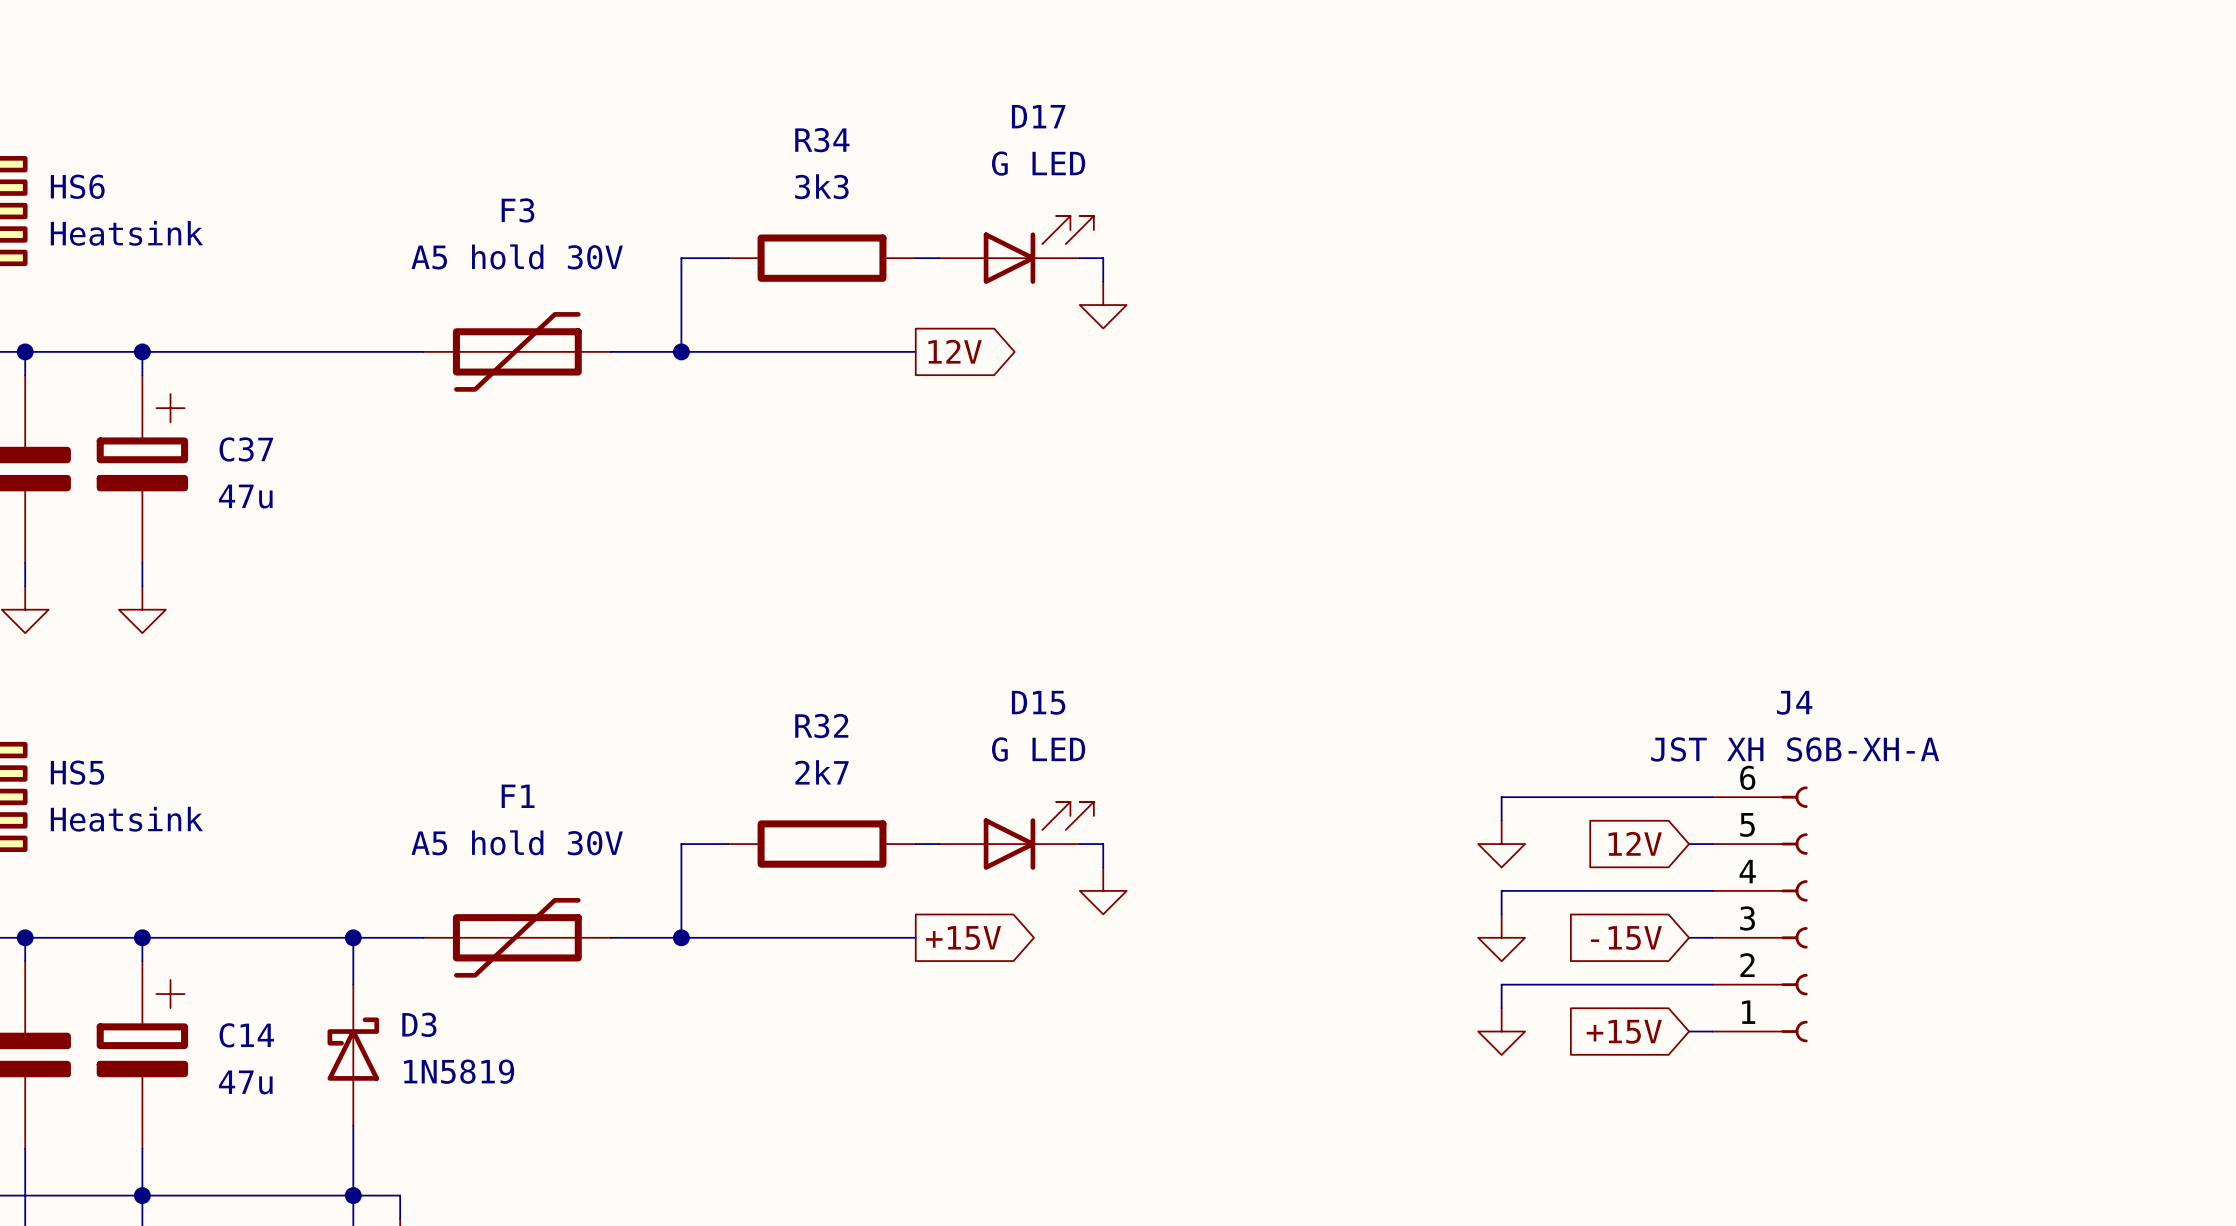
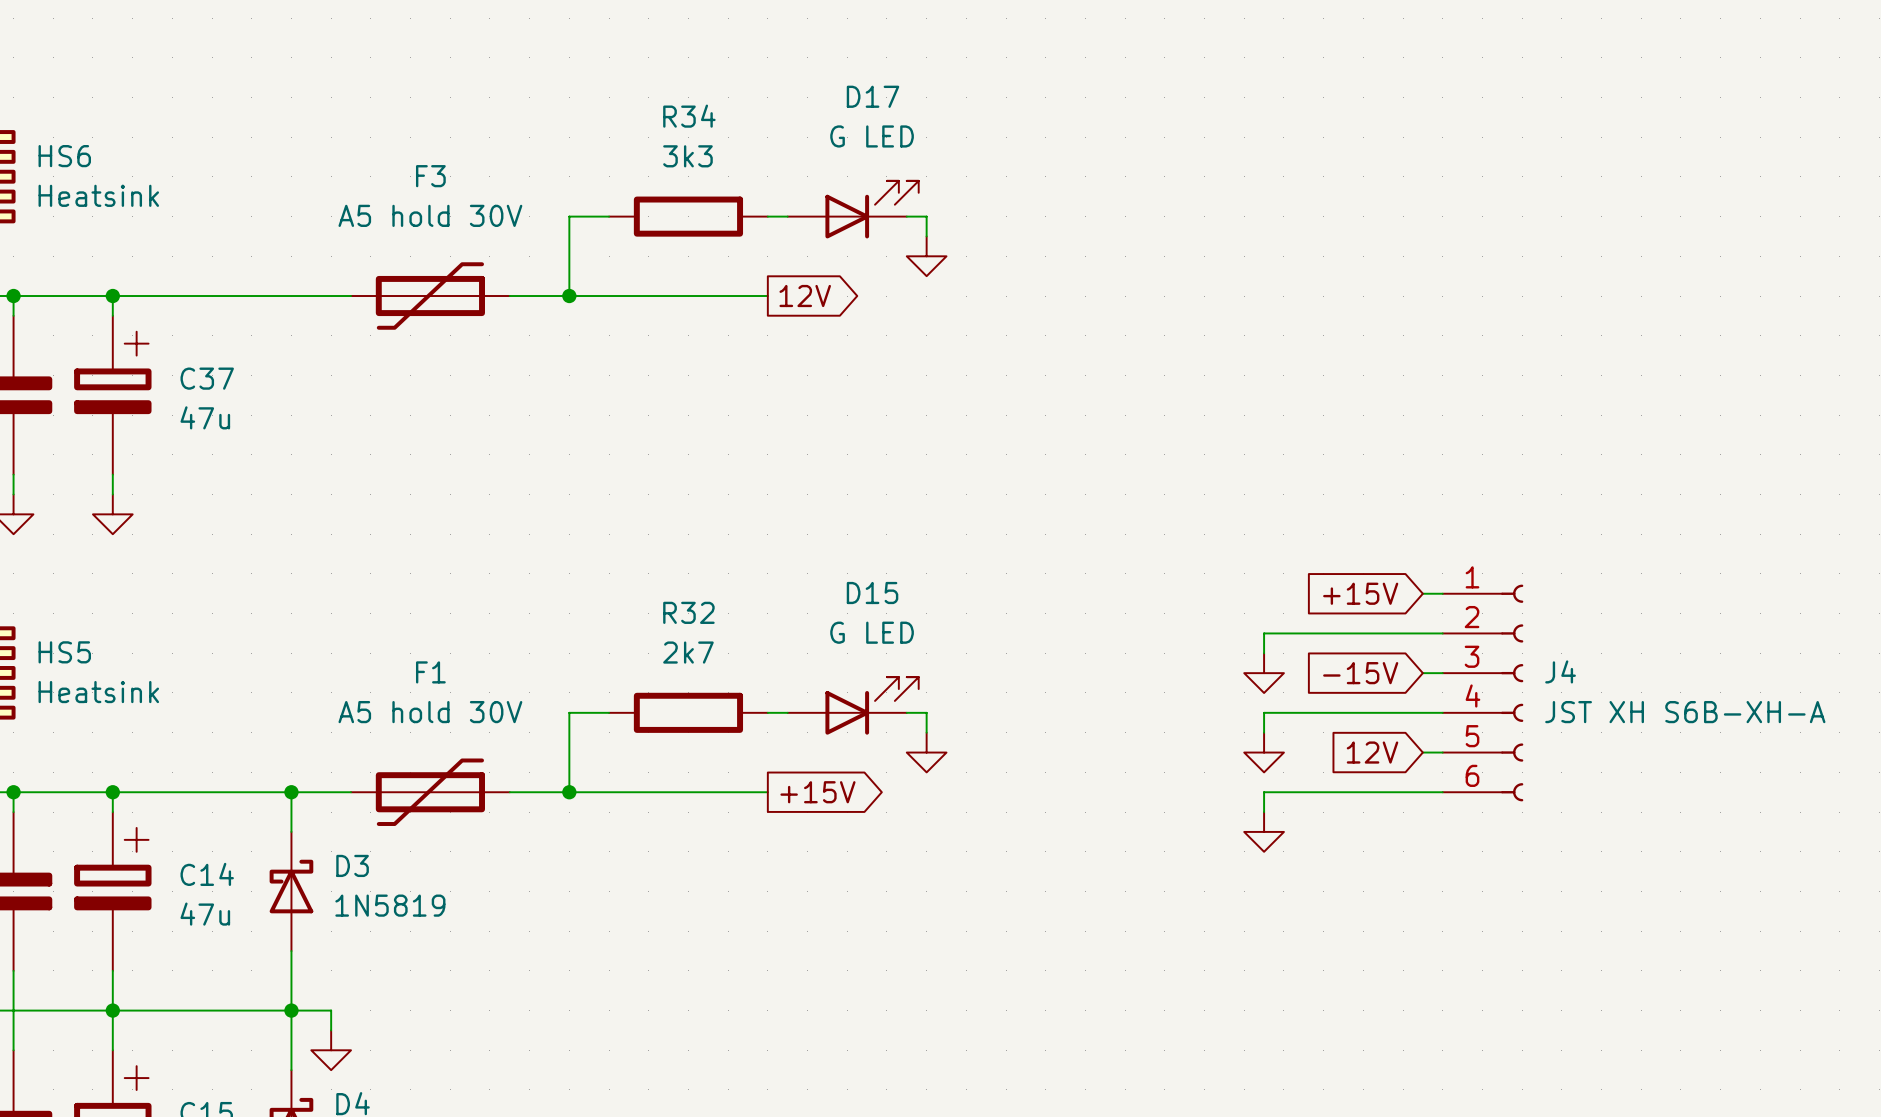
J4 name position: J4 (1794, 702) -> J4 (1560, 671)
J4 value position: JST XH S6B-XH-A (1795, 749) -> JST XH S6B-XH-A (1685, 712)
power symbol: none -> (1264, 673)
wire: (1689, 797) (1501, 797) (1501, 820) -> (1422, 712) (1264, 712) (1264, 732)
global label position: 12V (1635, 843) -> 12V (1372, 752)
power symbol: (1501, 844) -> none
power symbol: none -> (1264, 752)
wire: (1689, 890) (1501, 890) (1501, 914) -> (1422, 792) (1264, 792) (1264, 812)
J4 flip: as is (1794, 914) -> up-down (1512, 692)
power symbol: (1501, 937) -> none
global label position: -15V (1626, 938) -> -15V (1360, 673)
power symbol: none -> (1264, 831)
wire: (1712, 984) (1501, 984) (1501, 1008) -> (1442, 633) (1264, 633) (1264, 653)
power symbol: (1501, 1031) -> none
global label position: +15V (1624, 1031) -> +15V (1360, 593)
wire: (1689, 1031) (1712, 1031) -> (1422, 593) (1442, 593)

